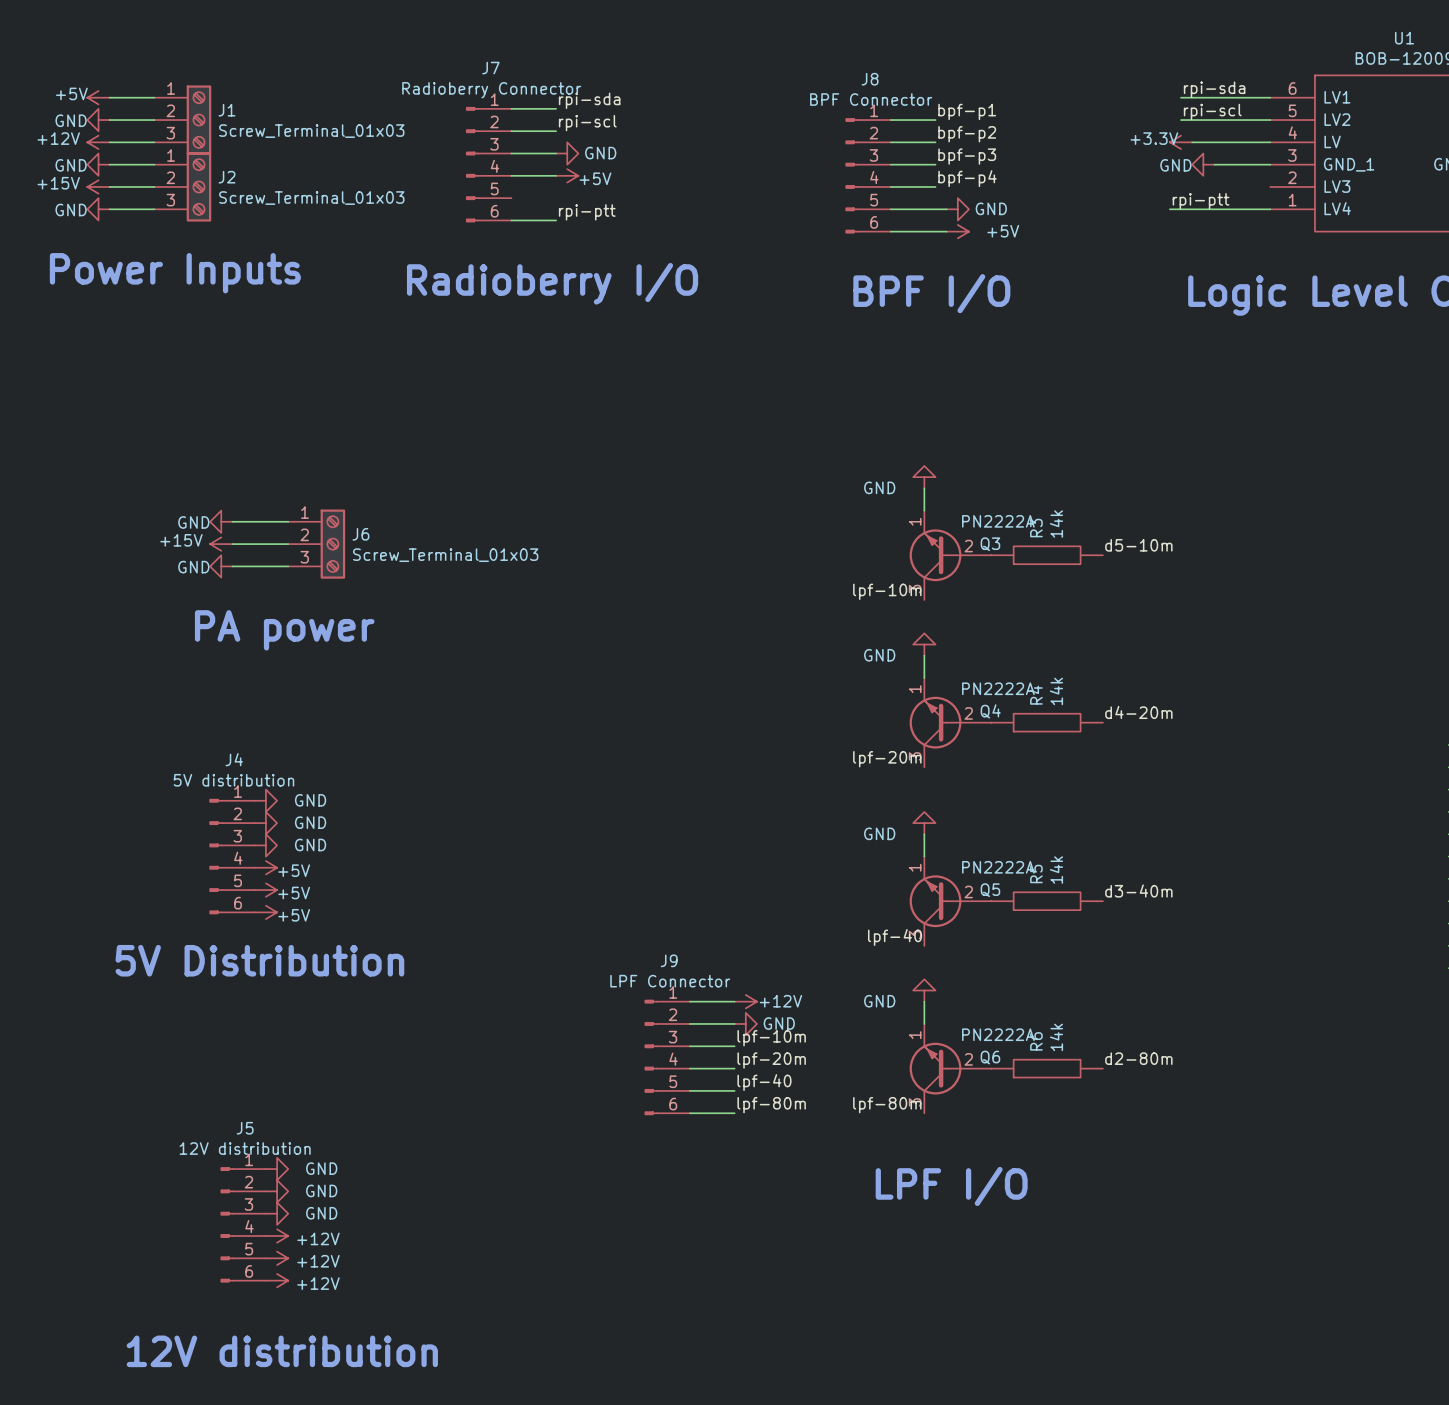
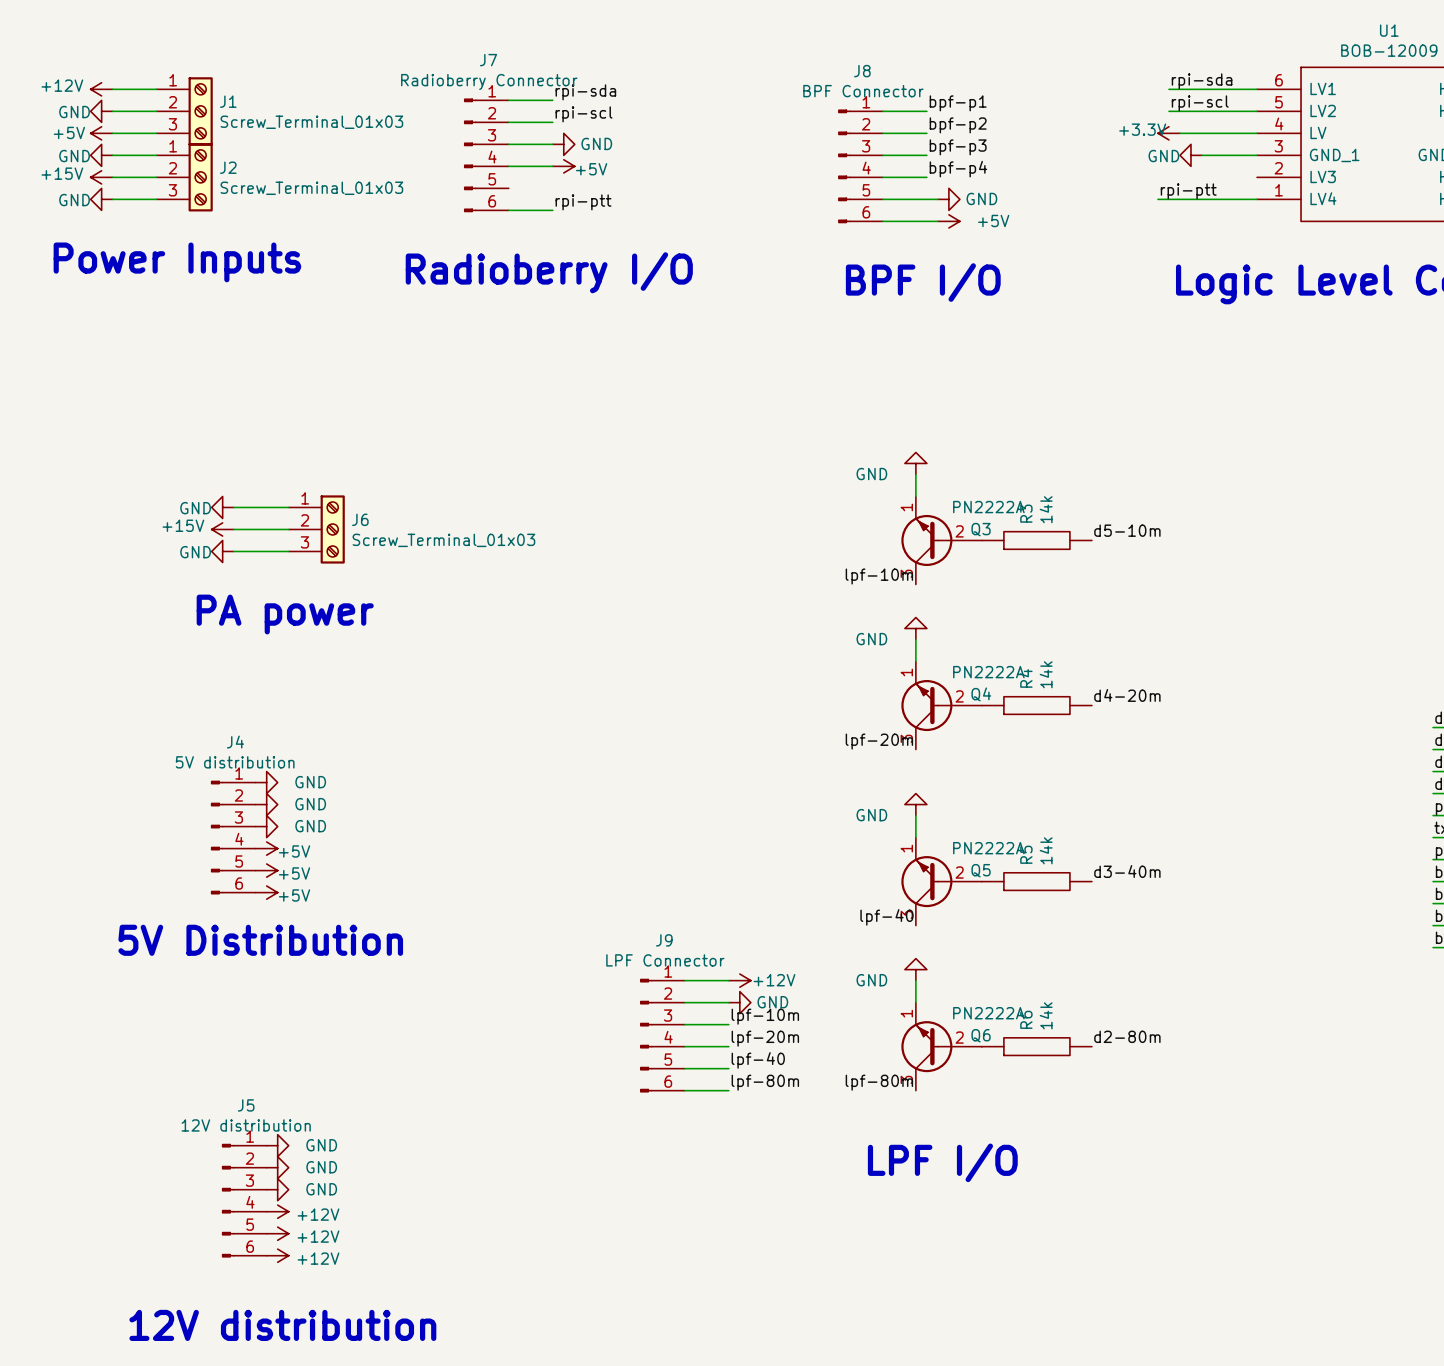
power symbol: +5V (98, 97) -> +12V (101, 89)
power symbol: +12V (98, 142) -> +5V (101, 133)

